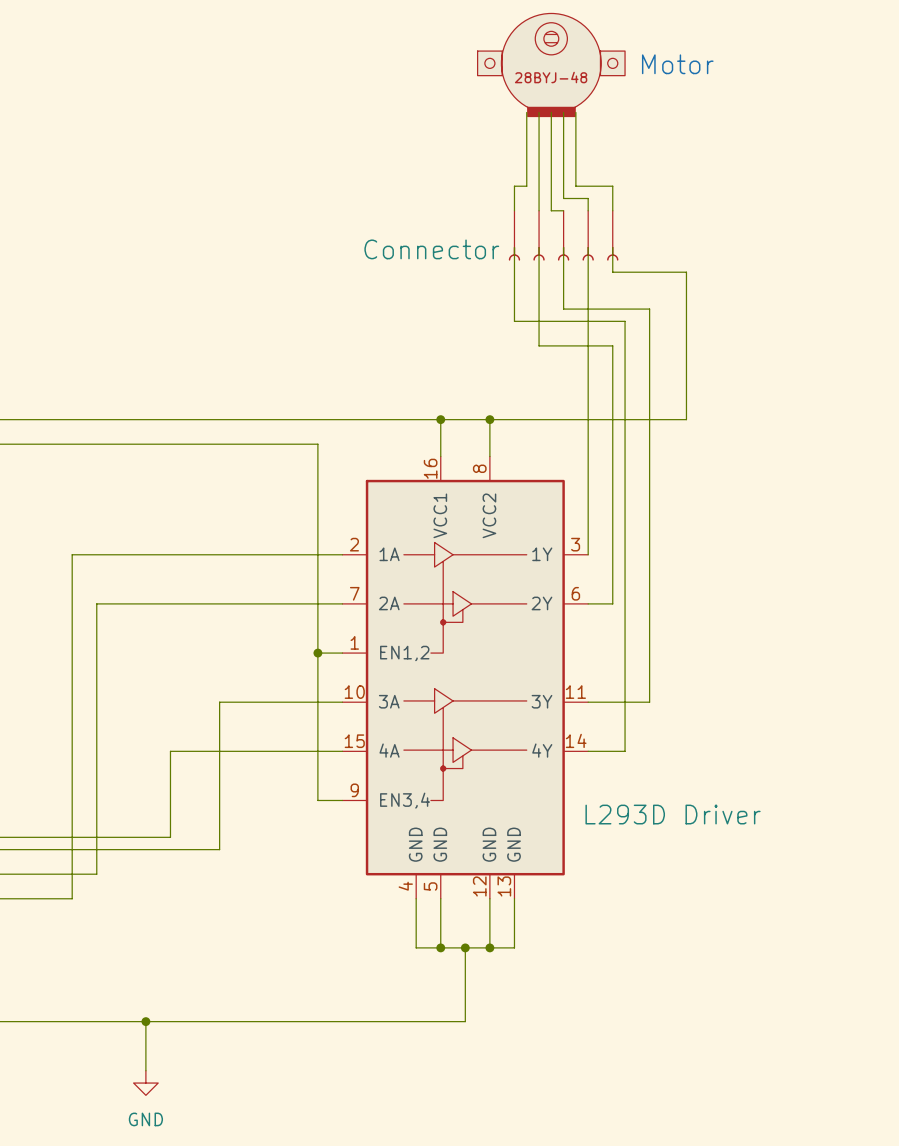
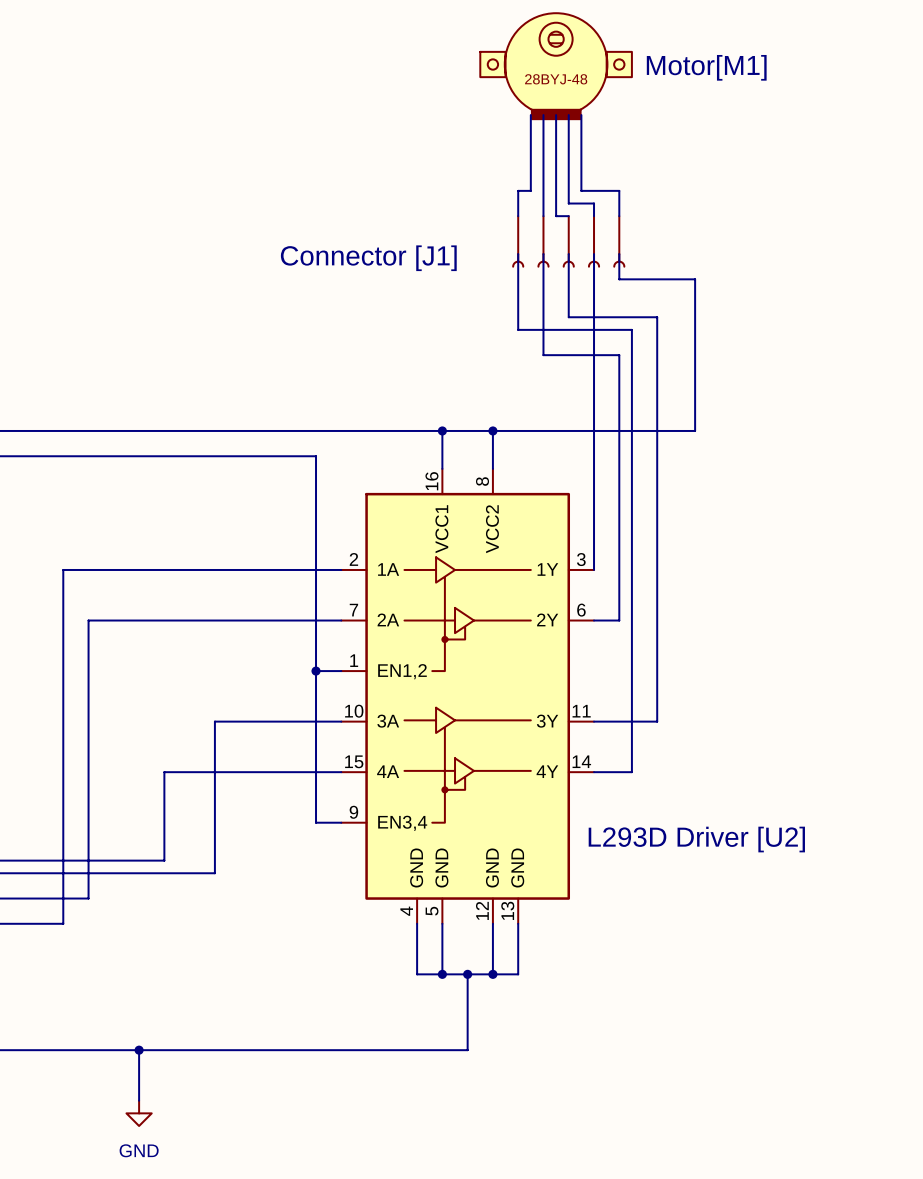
Motor name: Motor (677, 64) -> Motor[M1] (706, 67)
part value: Connector (431, 249) -> Connector [J1] (368, 258)
part value: L293D Driver (673, 814) -> L293D Driver [U2] (696, 839)

